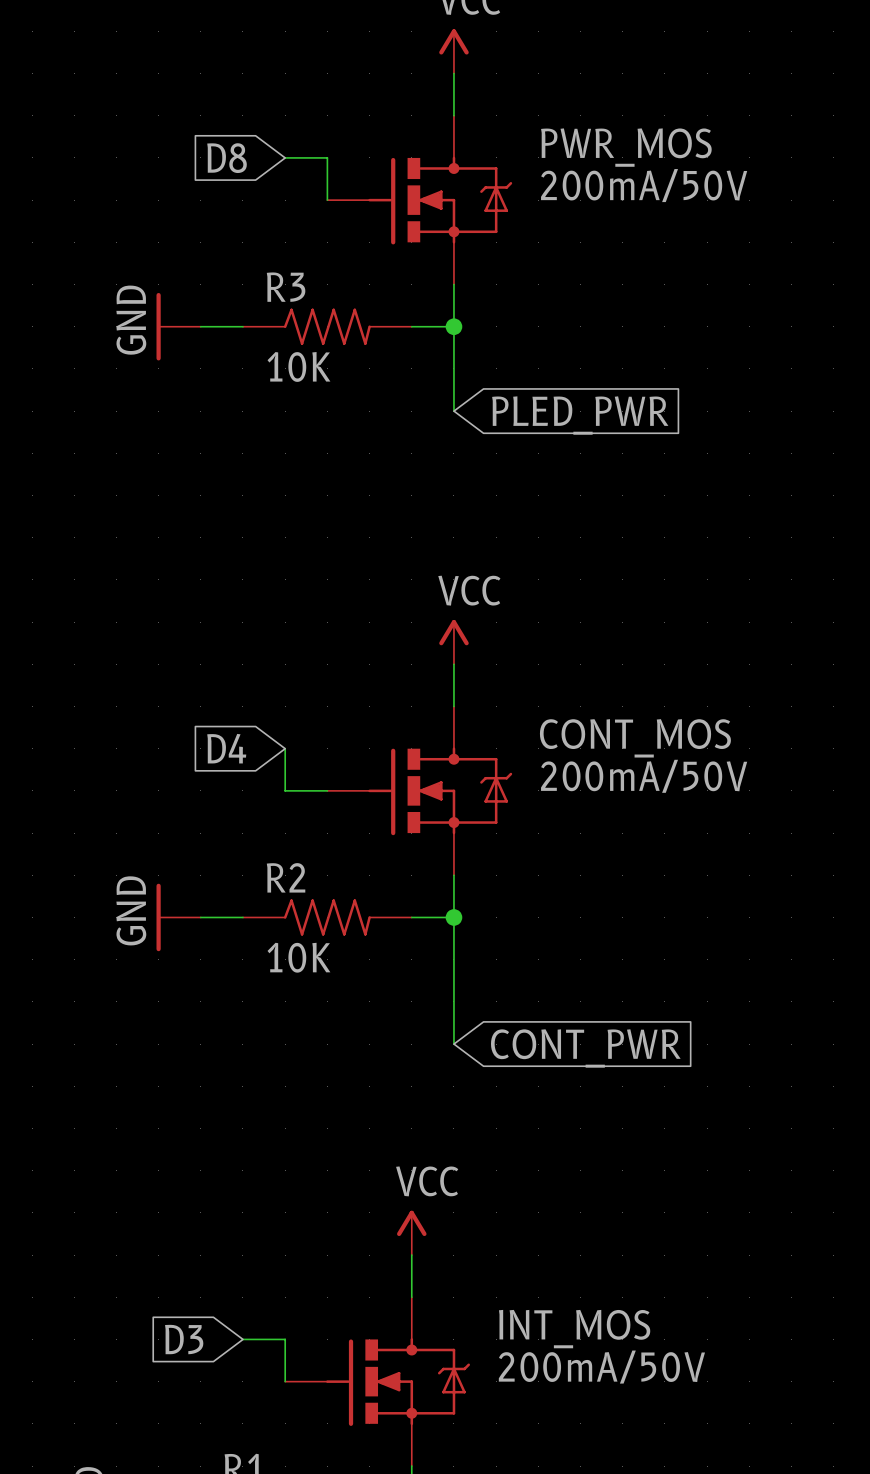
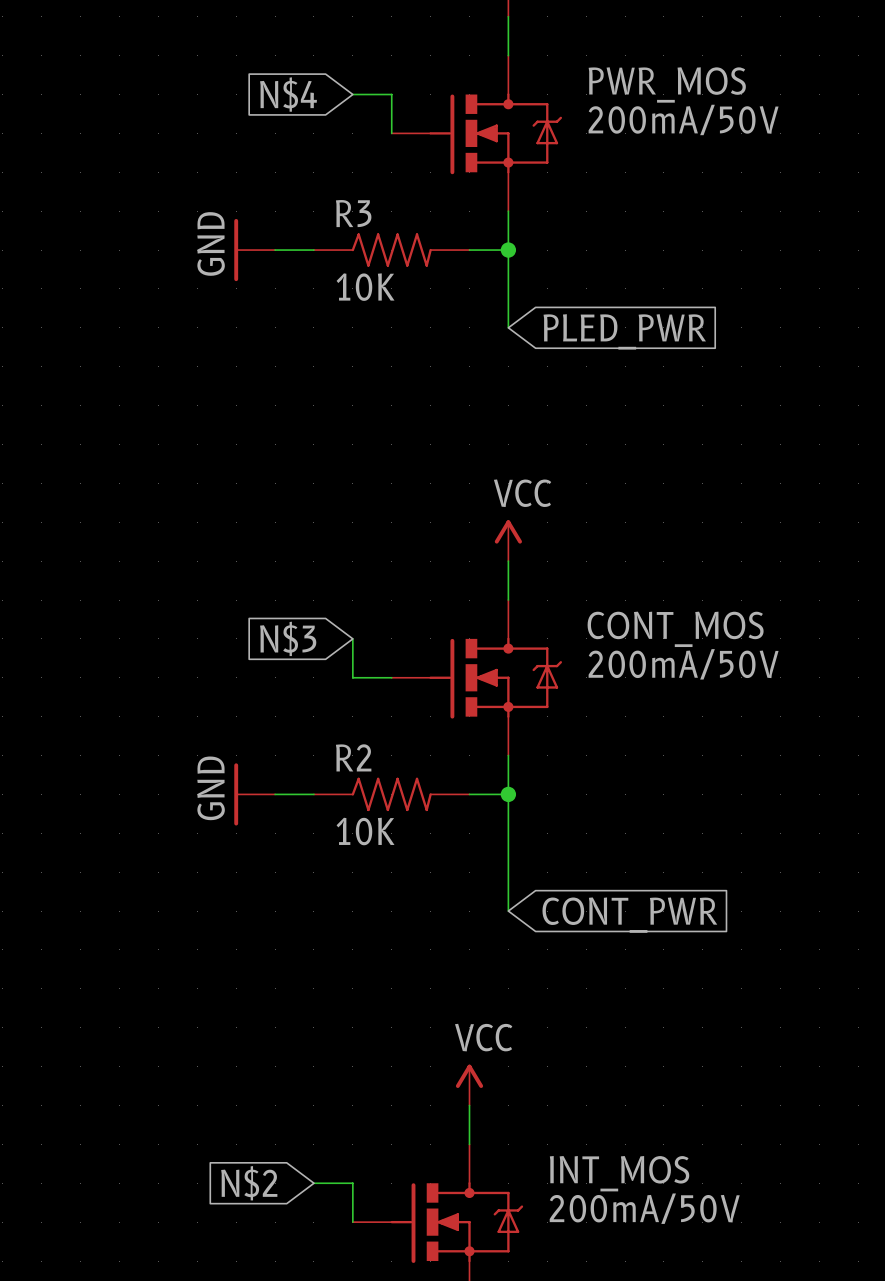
global label: D8 (227, 158) -> N$4 (288, 94)
global label: D4 (226, 748) -> N$3 (288, 638)
global label: D3 (184, 1339) -> N$2 (249, 1183)

